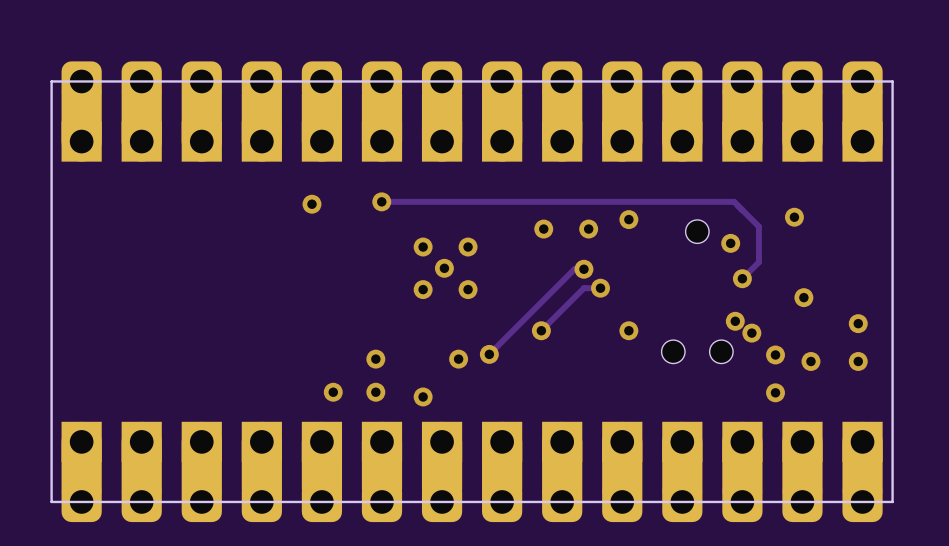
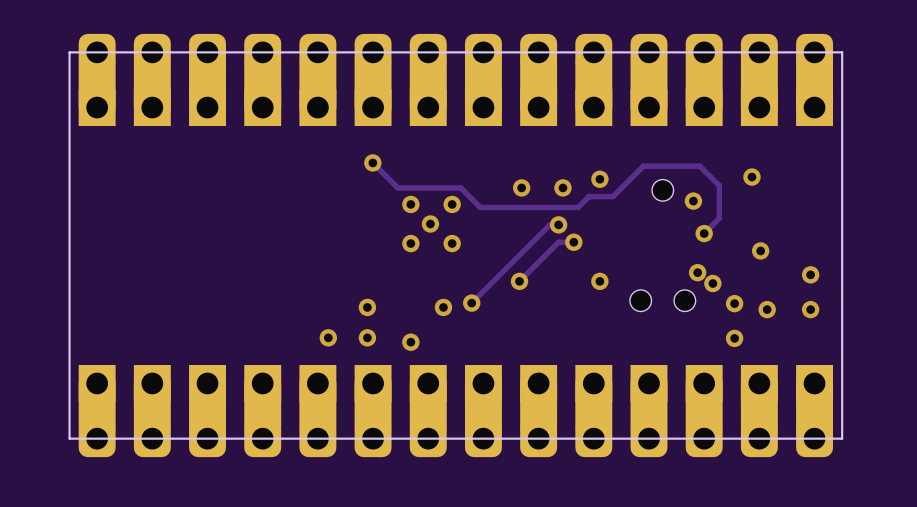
track: (381, 201) (734, 201) (737, 205) -> (371, 161) (397, 187) (460, 187) (480, 207) (578, 207) (589, 196) (612, 196) (643, 166) (699, 166)
via: (311, 204) -> none

